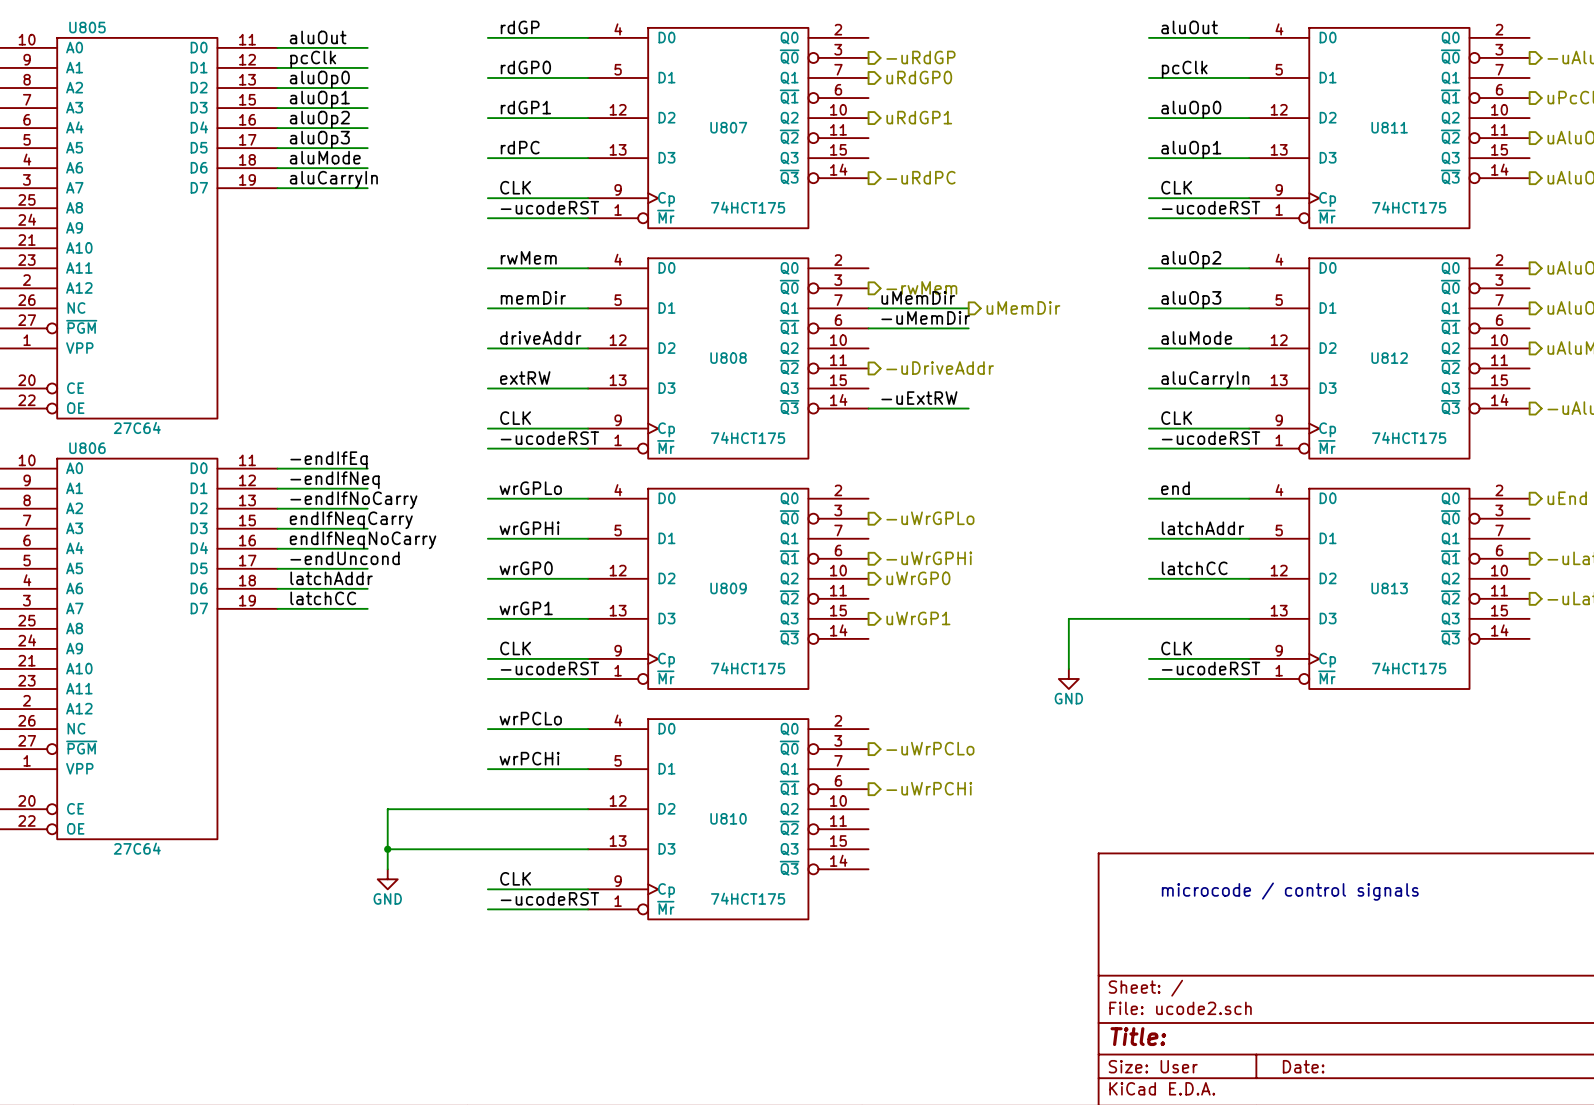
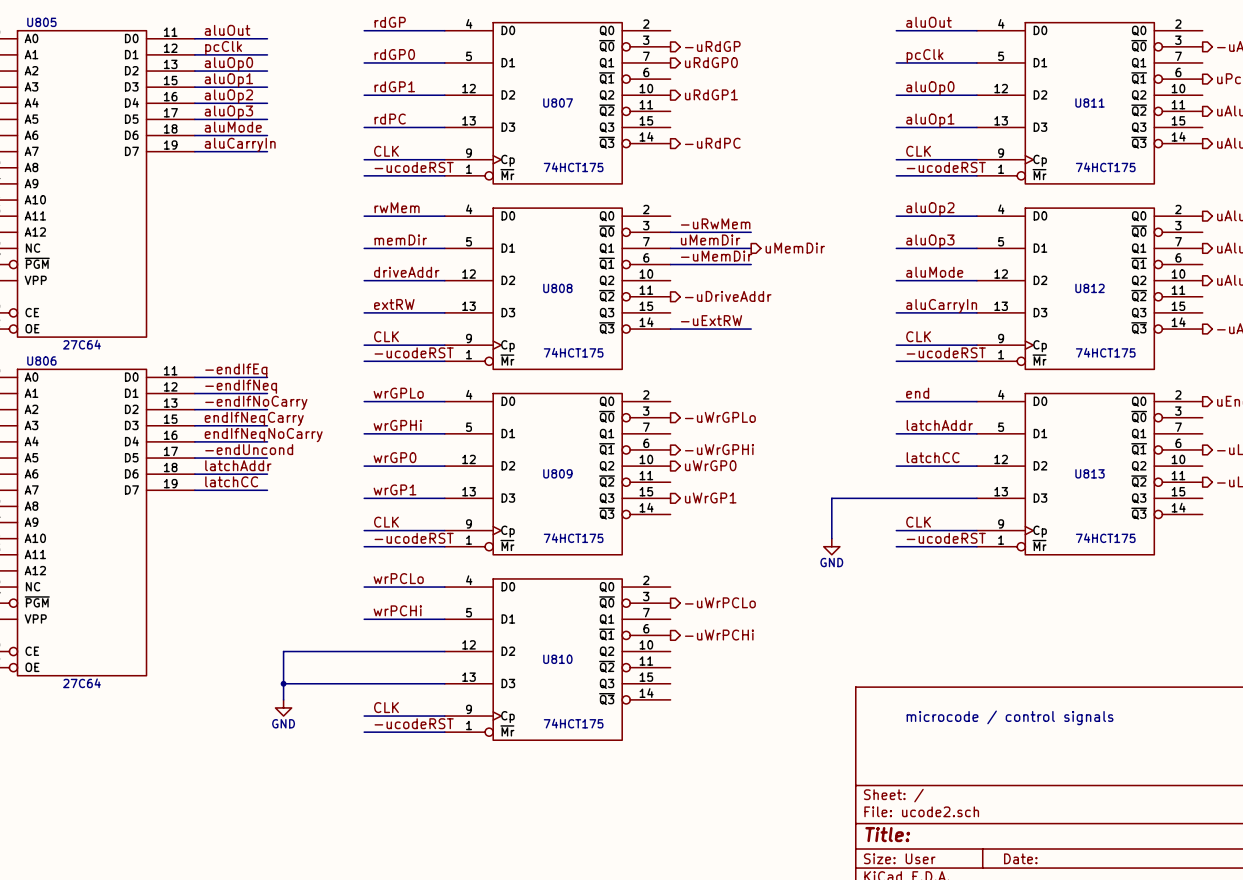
label: none -> -uRwMem (715, 223)
hierarchical label: -rwMem (921, 287) -> none
wire: none -> (670, 232) (751, 232)

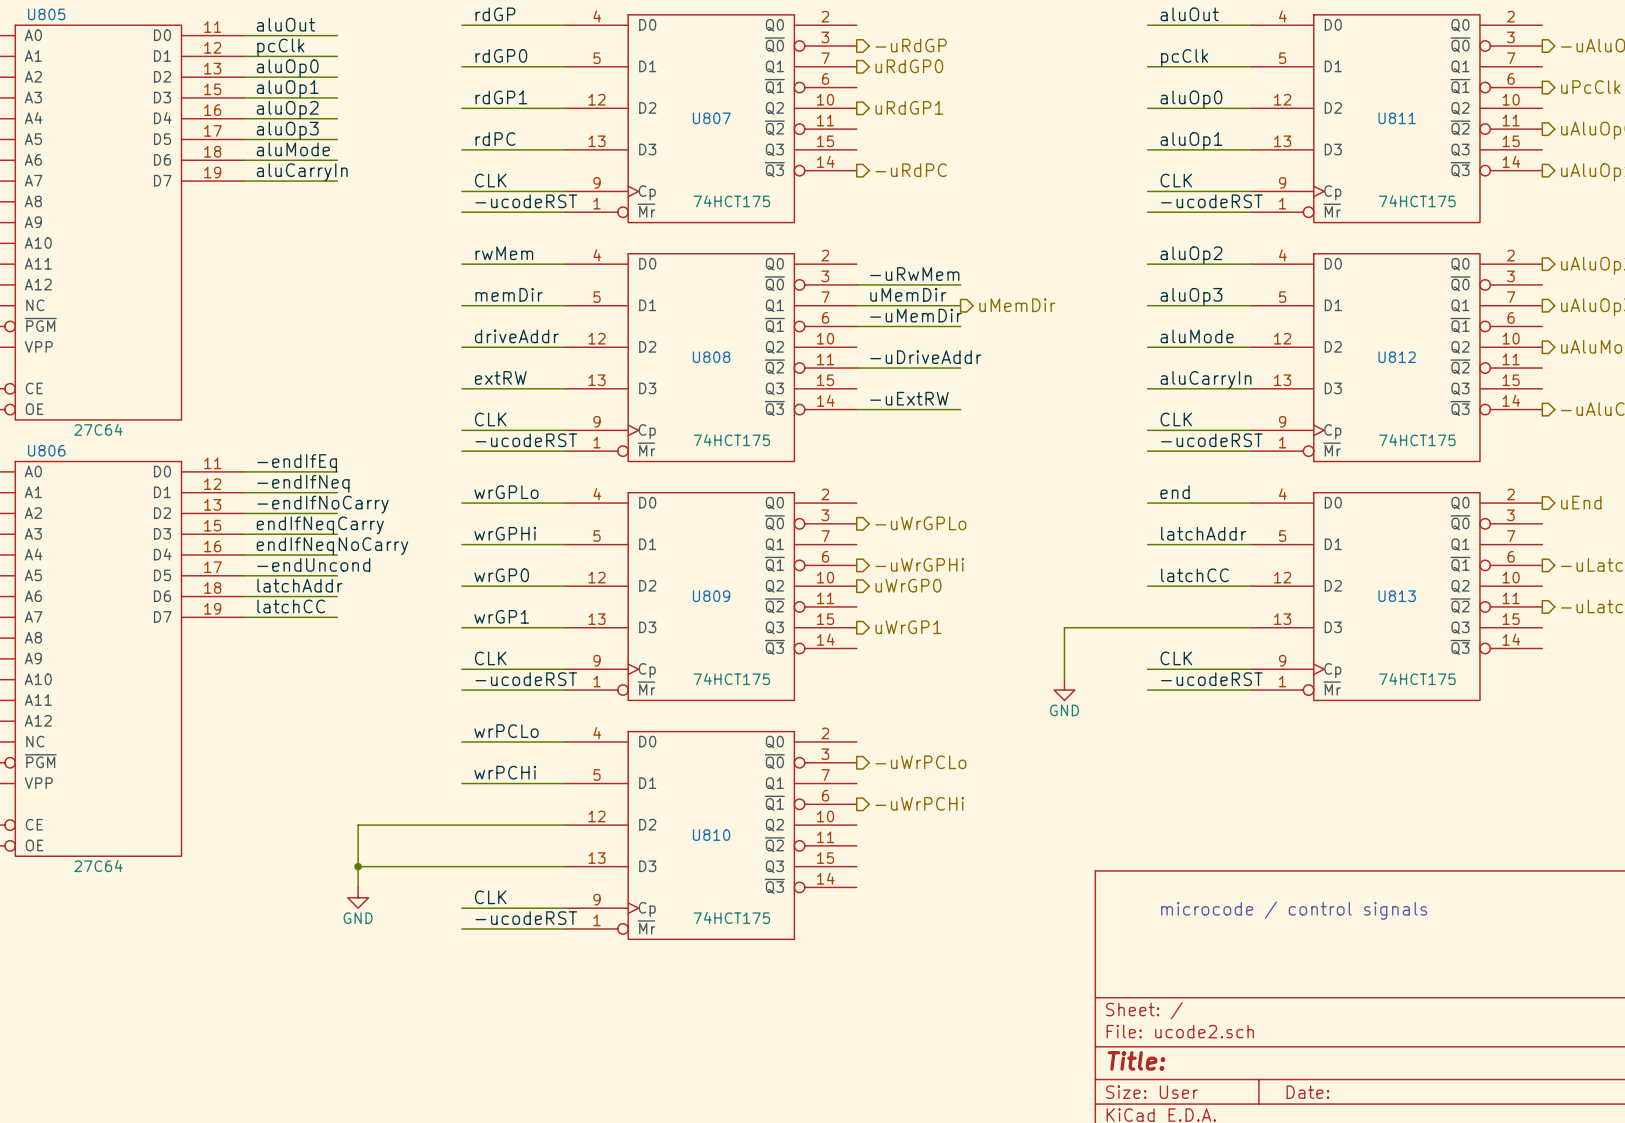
label: none -> -uDriveAddr (925, 357)
wire: none -> (856, 368) (960, 368)
hierarchical label: -uDriveAddr (728, 296) -> none

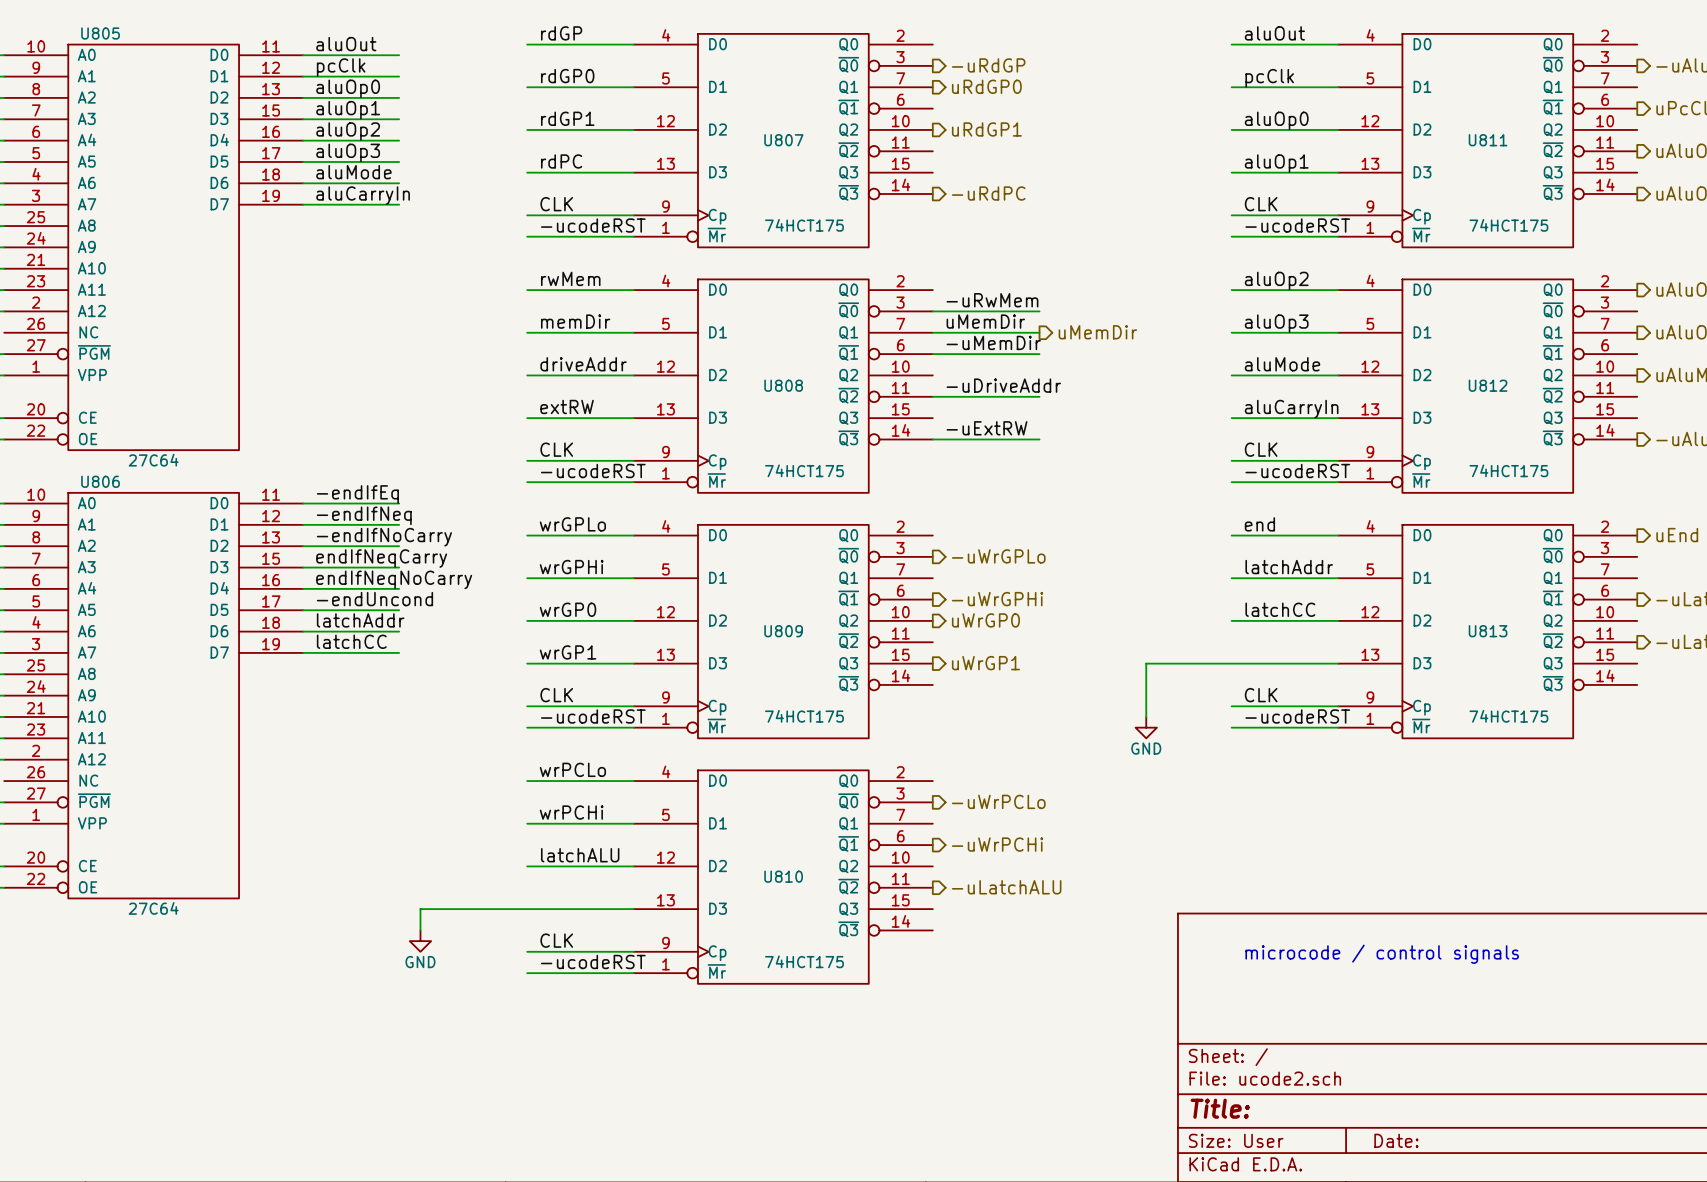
label: none -> latchALU (580, 855)
wire: (461, 825) (358, 825) (358, 866) -> none
hierarchical label: none -> -uLatchALU (1006, 887)
junction: (358, 866) -> none

